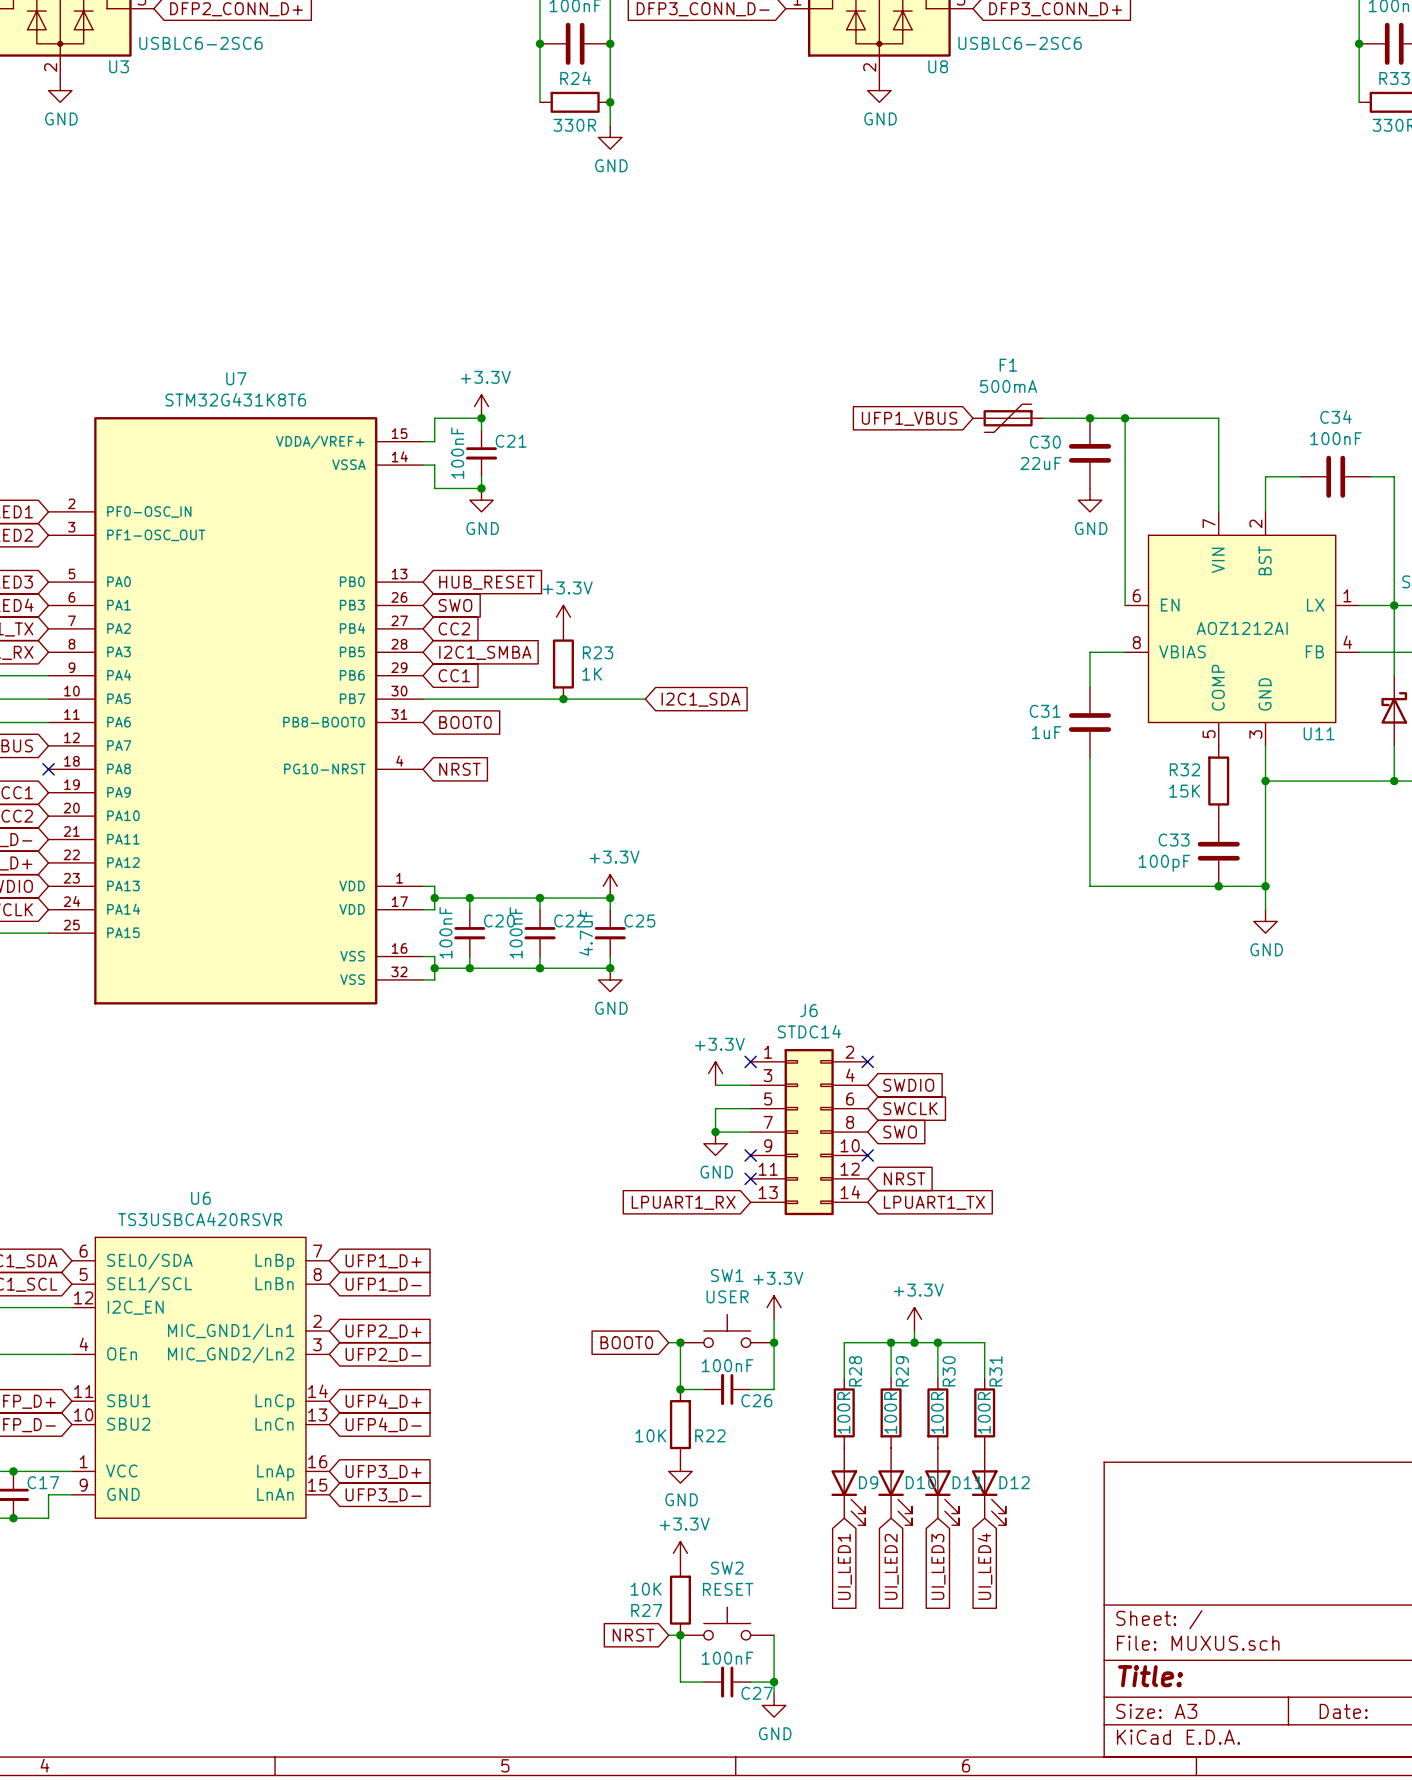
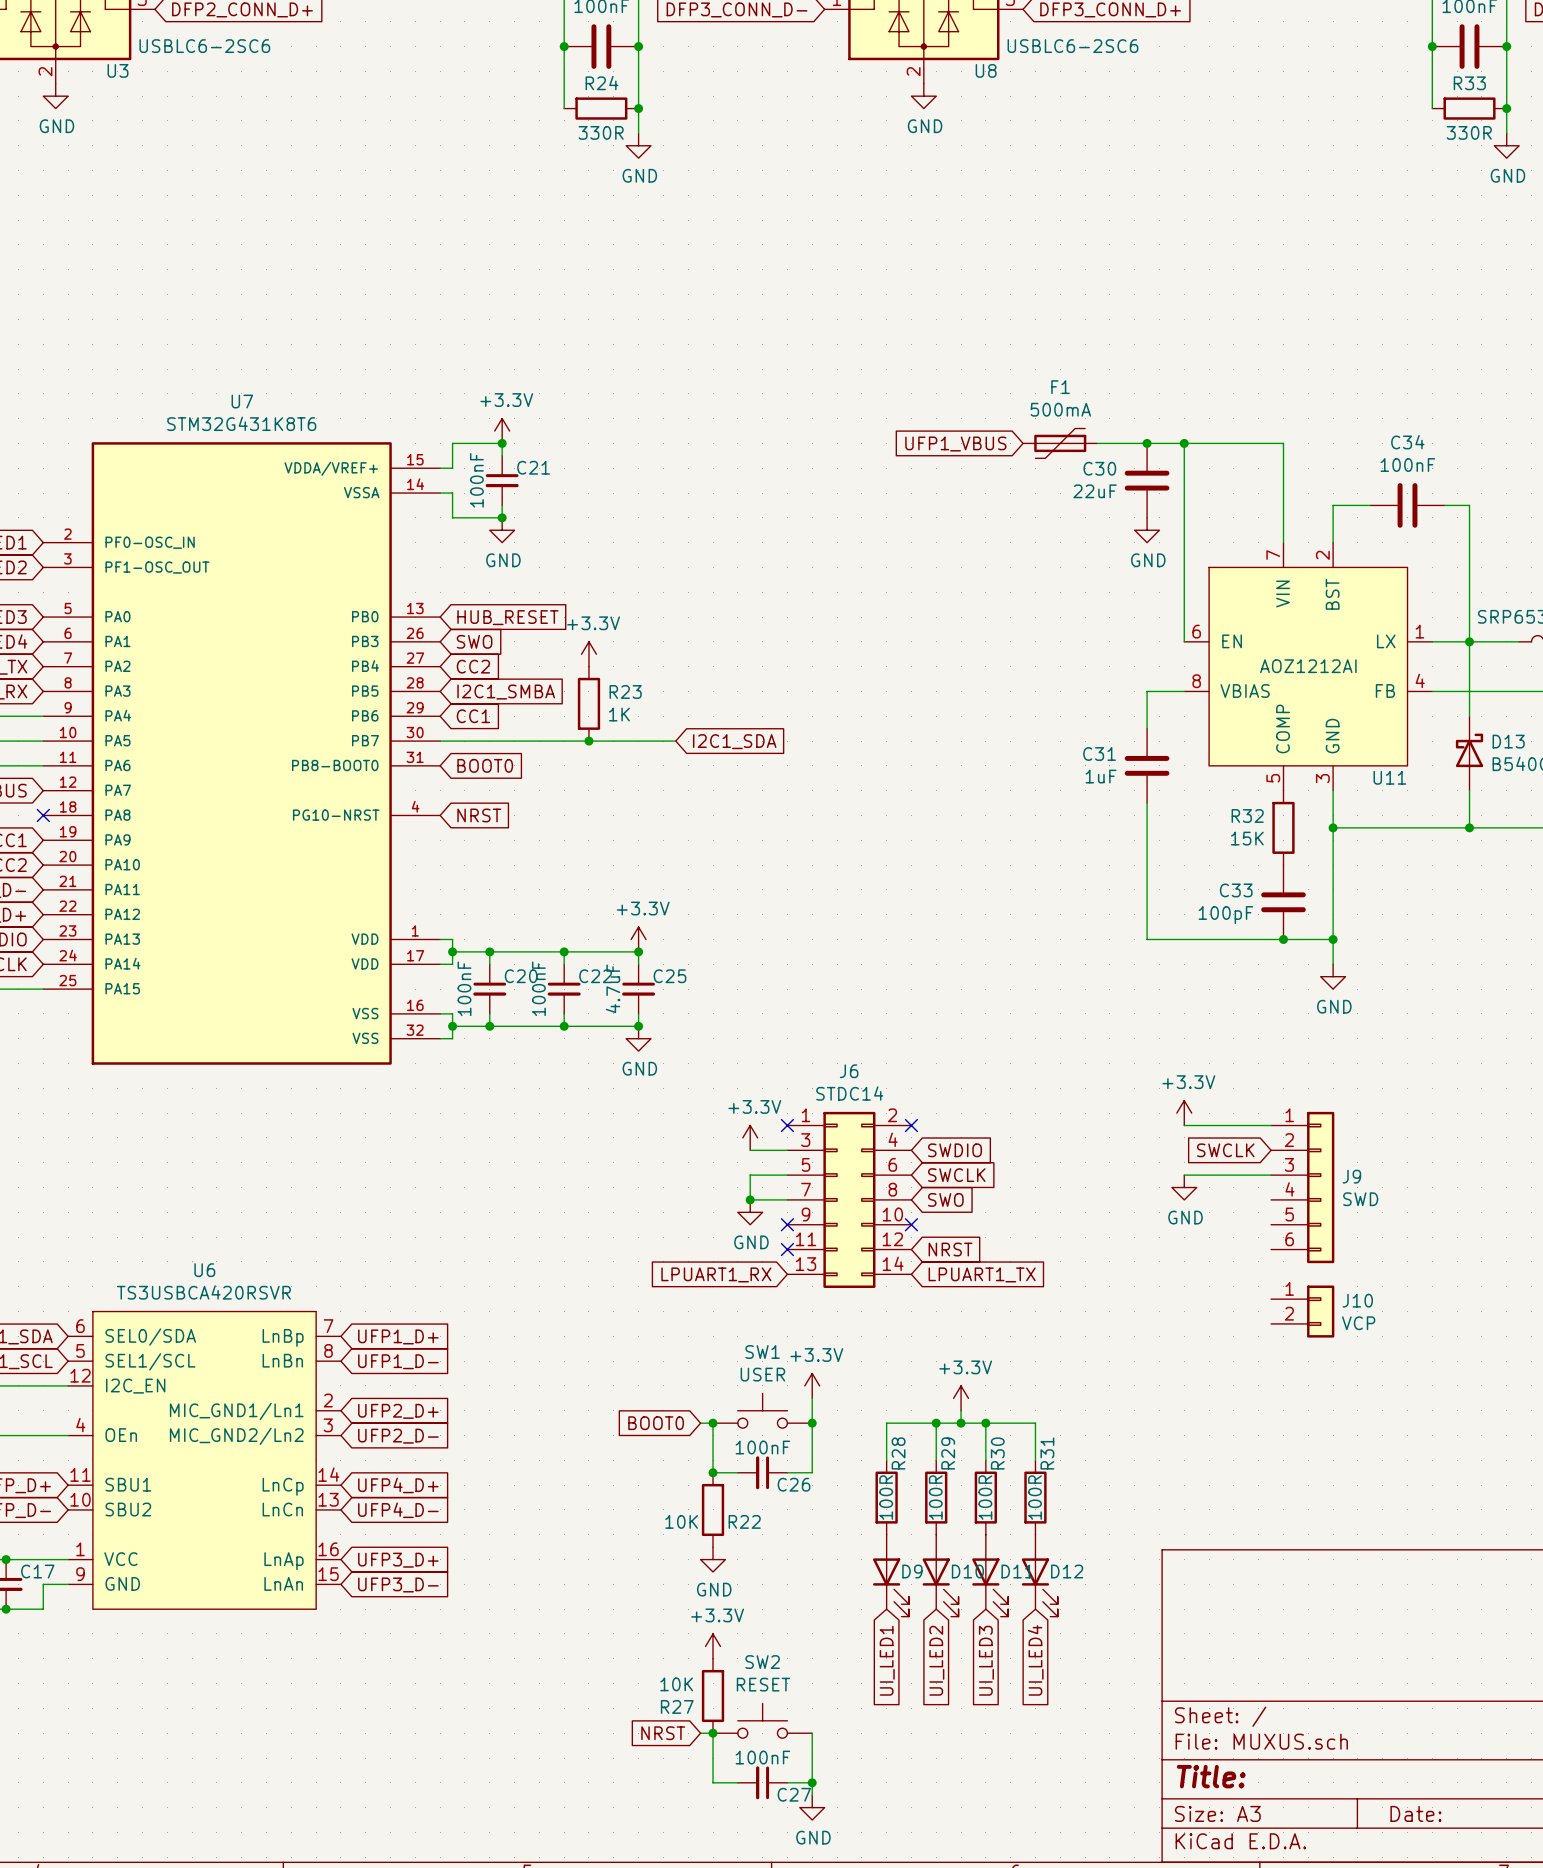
power symbol: none -> +3.3V (1184, 1113)
wire: none -> (1184, 1125) (1271, 1125)
global label: none -> SWCLK (1225, 1150)
wire: none -> (1184, 1175) (1271, 1175)
power symbol: none -> GND (1184, 1187)
J9: none -> SWD (1302, 1187)
J10: none -> VCP (1302, 1311)

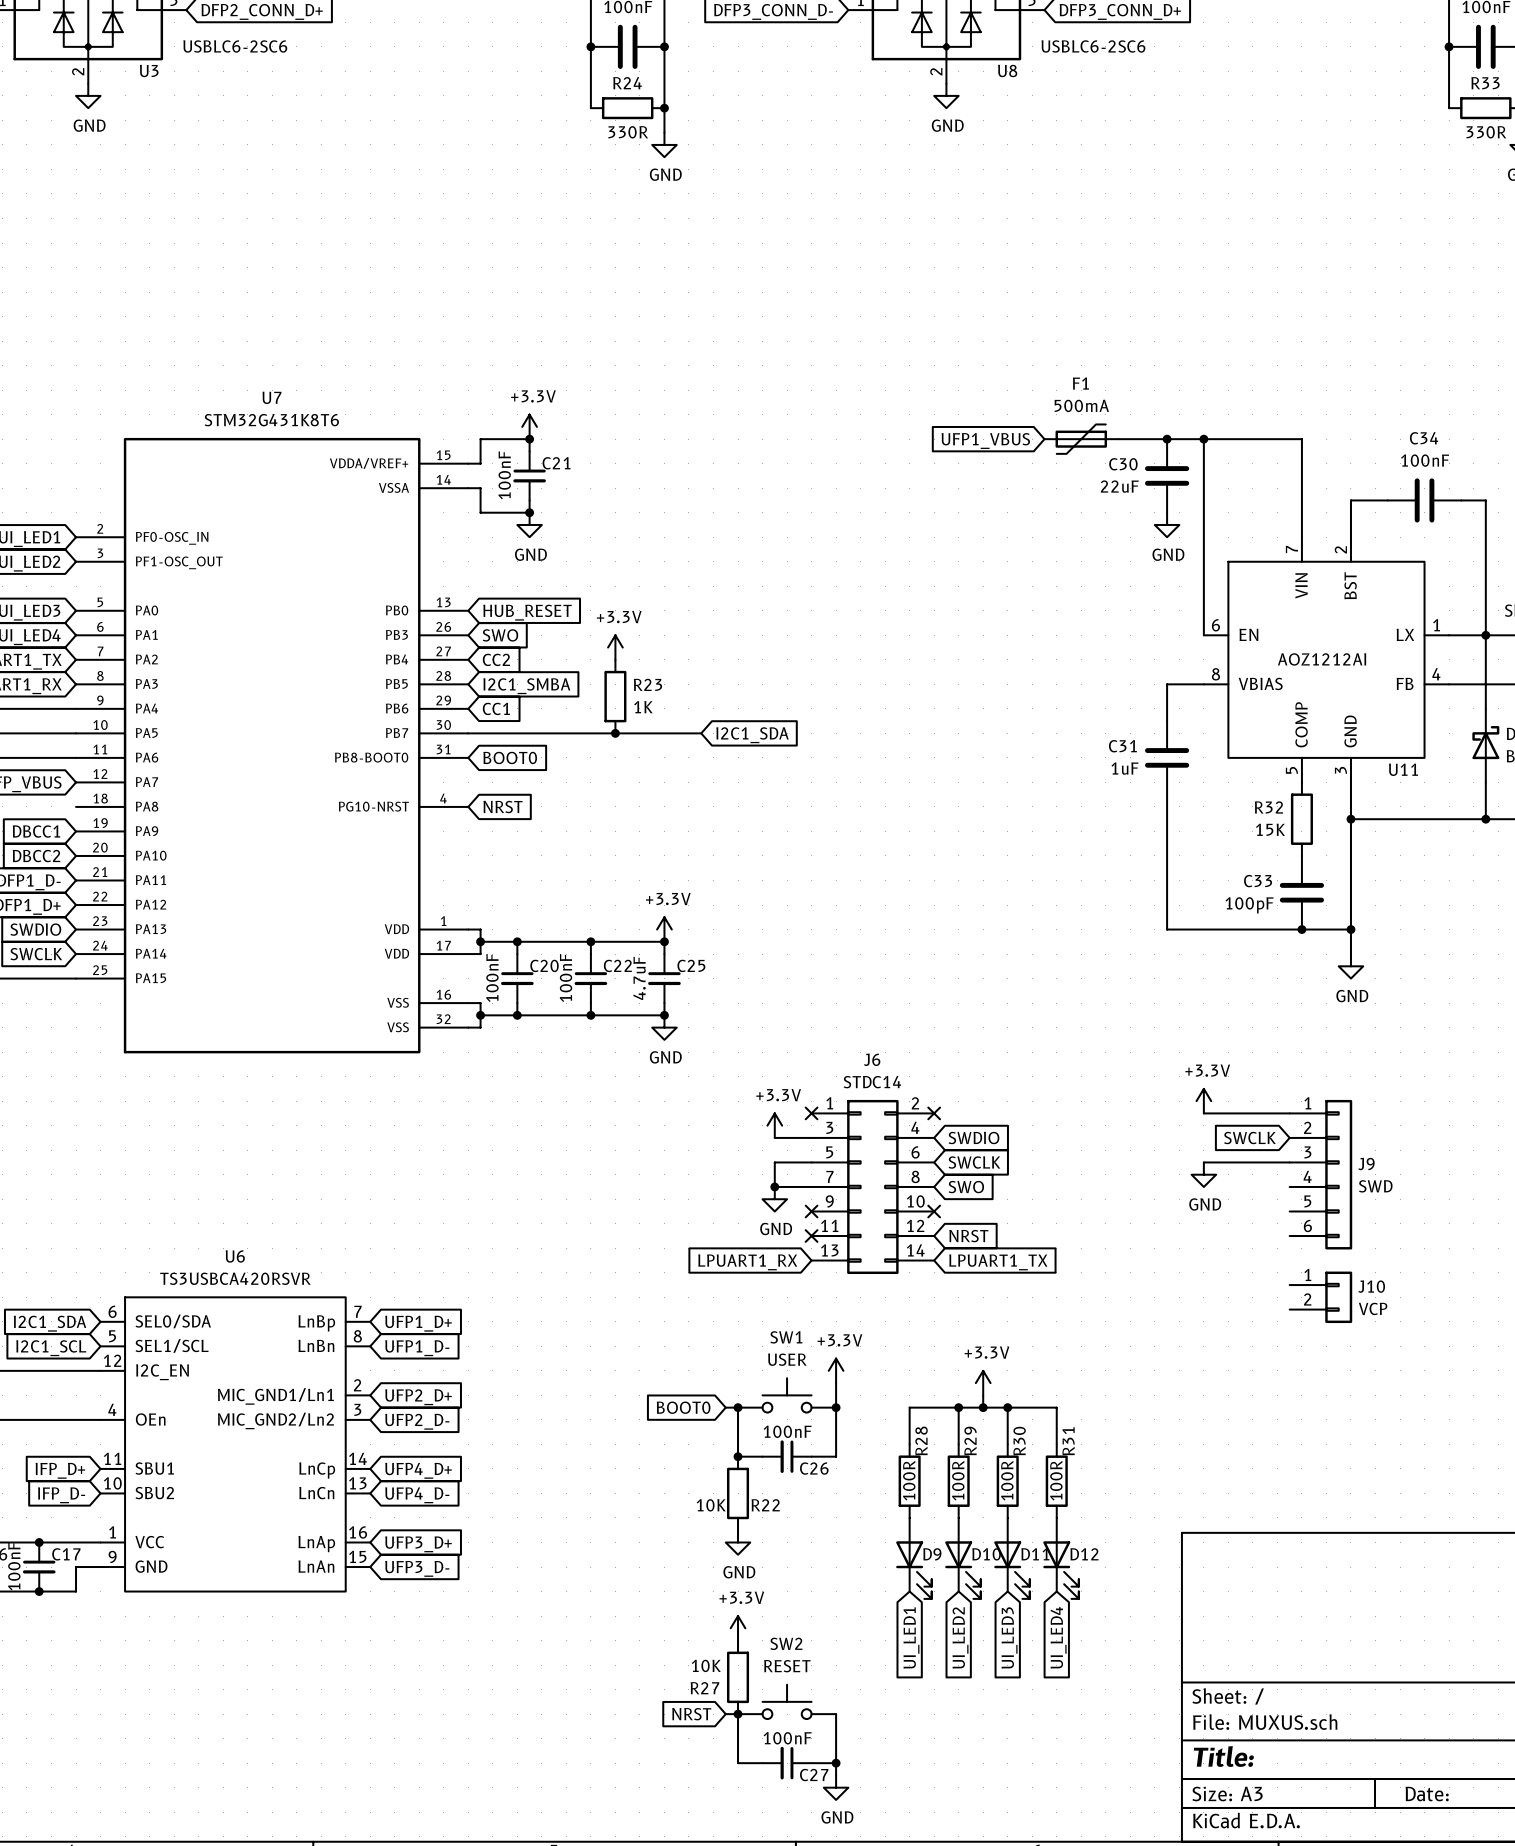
no-connect mark: (43, 815) -> none

